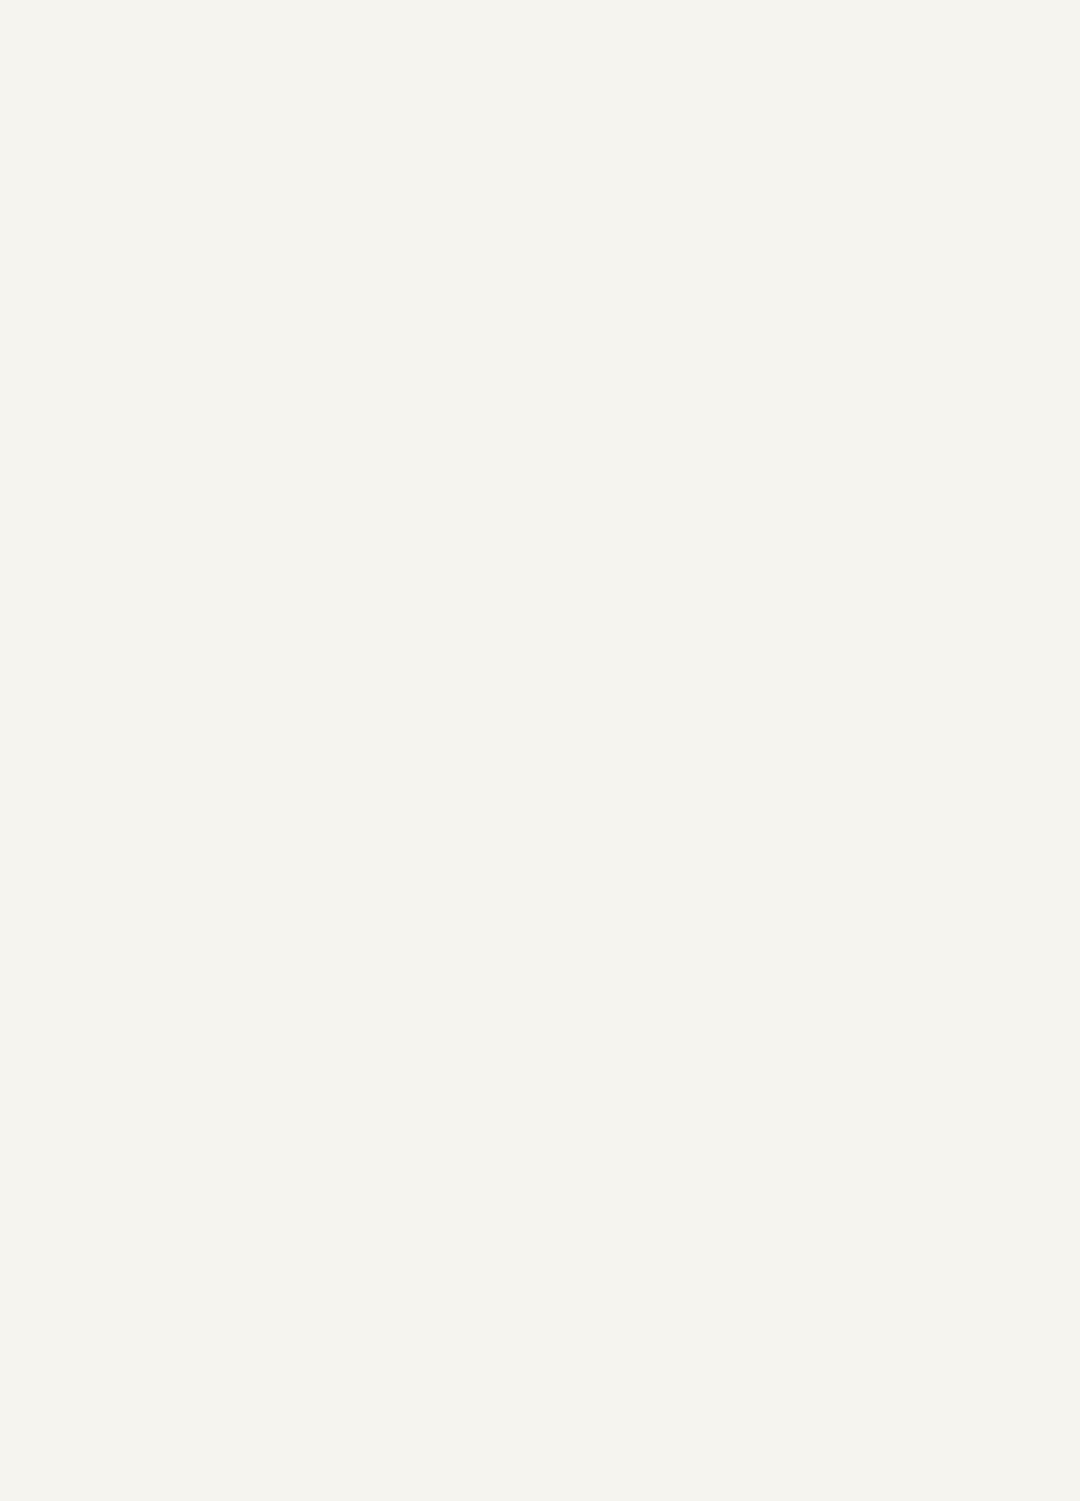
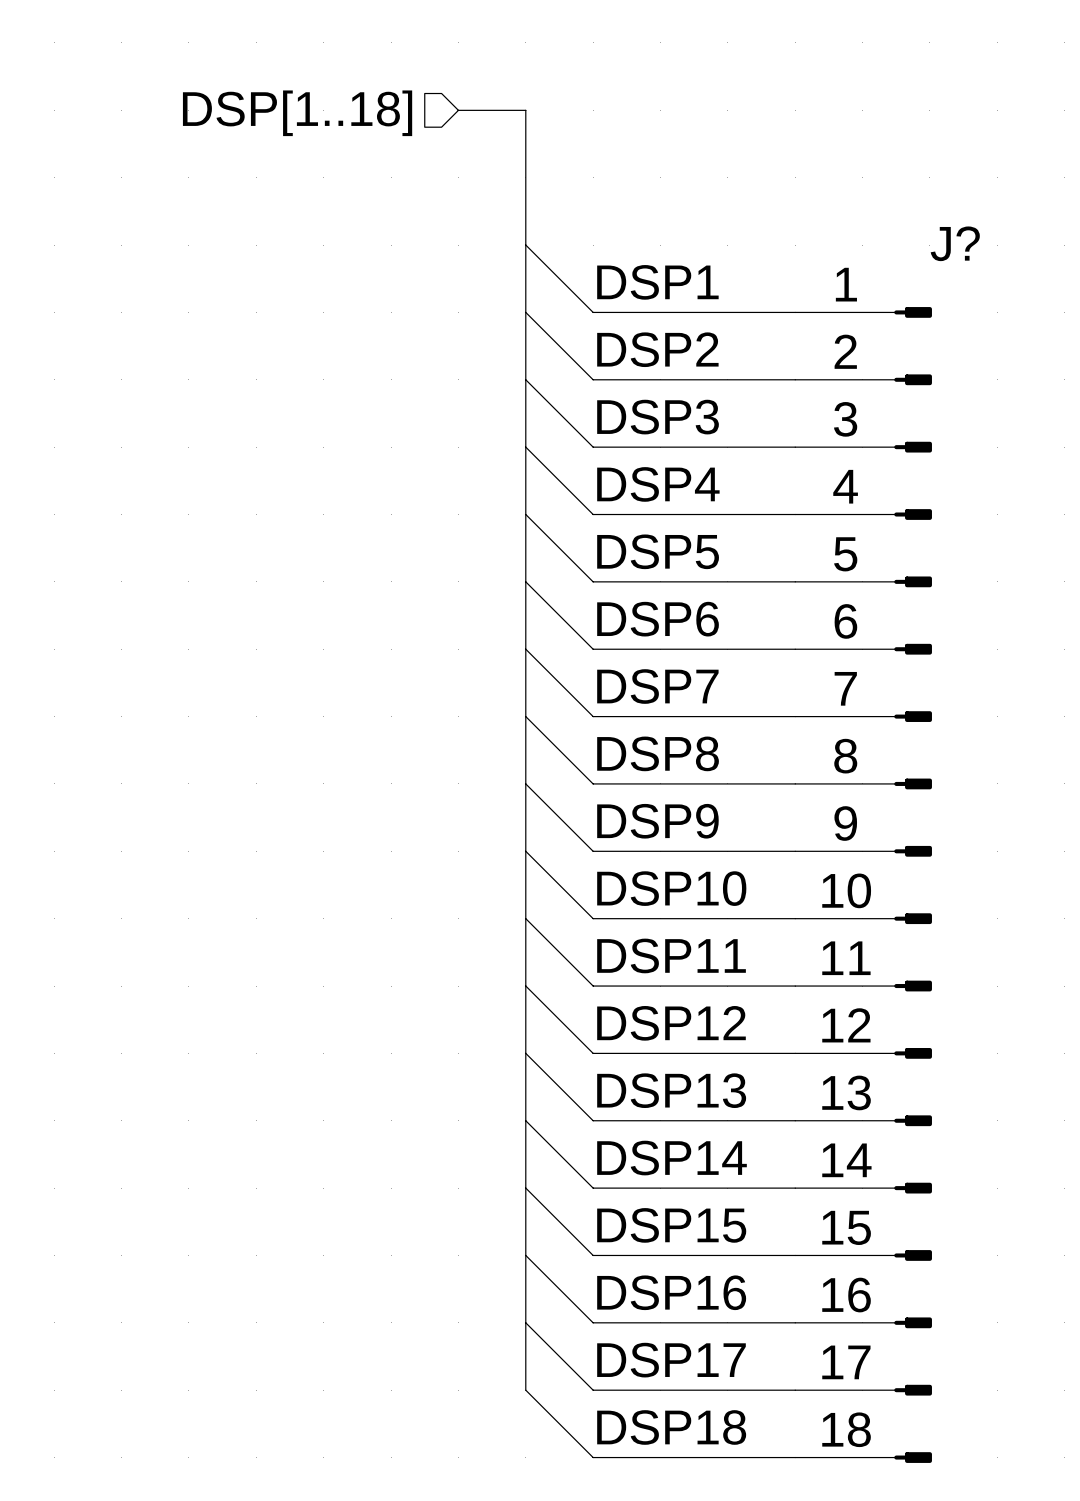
bus: none -> (458, 110) (525, 110) (525, 1390)
hierarchical label: none -> DSP[1..18] (297, 113)
wire: none -> (525, 245) (593, 312) (795, 312)
label: none -> DSP1 (657, 282)
wire: none -> (525, 312) (593, 379) (795, 379)
label: none -> DSP2 (657, 349)
wire: none -> (525, 379) (593, 447) (795, 447)
label: none -> DSP3 (658, 417)
wire: none -> (525, 447) (593, 514) (795, 514)
label: none -> DSP4 (658, 484)
wire: none -> (525, 514) (593, 581) (795, 581)
label: none -> DSP5 (658, 551)
wire: none -> (525, 581) (593, 649) (795, 649)
label: none -> DSP6 (658, 619)
wire: none -> (525, 649) (593, 716) (795, 716)
label: none -> DSP7 (657, 686)
wire: none -> (525, 716) (593, 783) (795, 783)
label: none -> DSP8 (658, 753)
wire: none -> (525, 783) (593, 851) (795, 851)
label: none -> DSP9 (657, 821)
wire: none -> (525, 851) (593, 918) (795, 918)
J?: none -> (863, 884)
label: none -> DSP10 (671, 888)
wire: none -> (525, 918) (593, 986) (795, 986)
label: none -> DSP11 (671, 955)
wire: none -> (525, 986) (593, 1053) (795, 1053)
label: none -> DSP12 (671, 1023)
wire: none -> (525, 1053) (593, 1120) (795, 1120)
label: none -> DSP13 (671, 1090)
wire: none -> (525, 1120) (593, 1188) (795, 1188)
label: none -> DSP14 (672, 1158)
wire: none -> (525, 1188) (593, 1255) (795, 1255)
label: none -> DSP15 (671, 1225)
wire: none -> (525, 1255) (593, 1322) (795, 1322)
label: none -> DSP16 (671, 1292)
wire: none -> (525, 1322) (593, 1390) (795, 1390)
label: none -> DSP17 (671, 1360)
wire: none -> (525, 1390) (593, 1457) (795, 1457)
label: none -> DSP18 (671, 1427)

